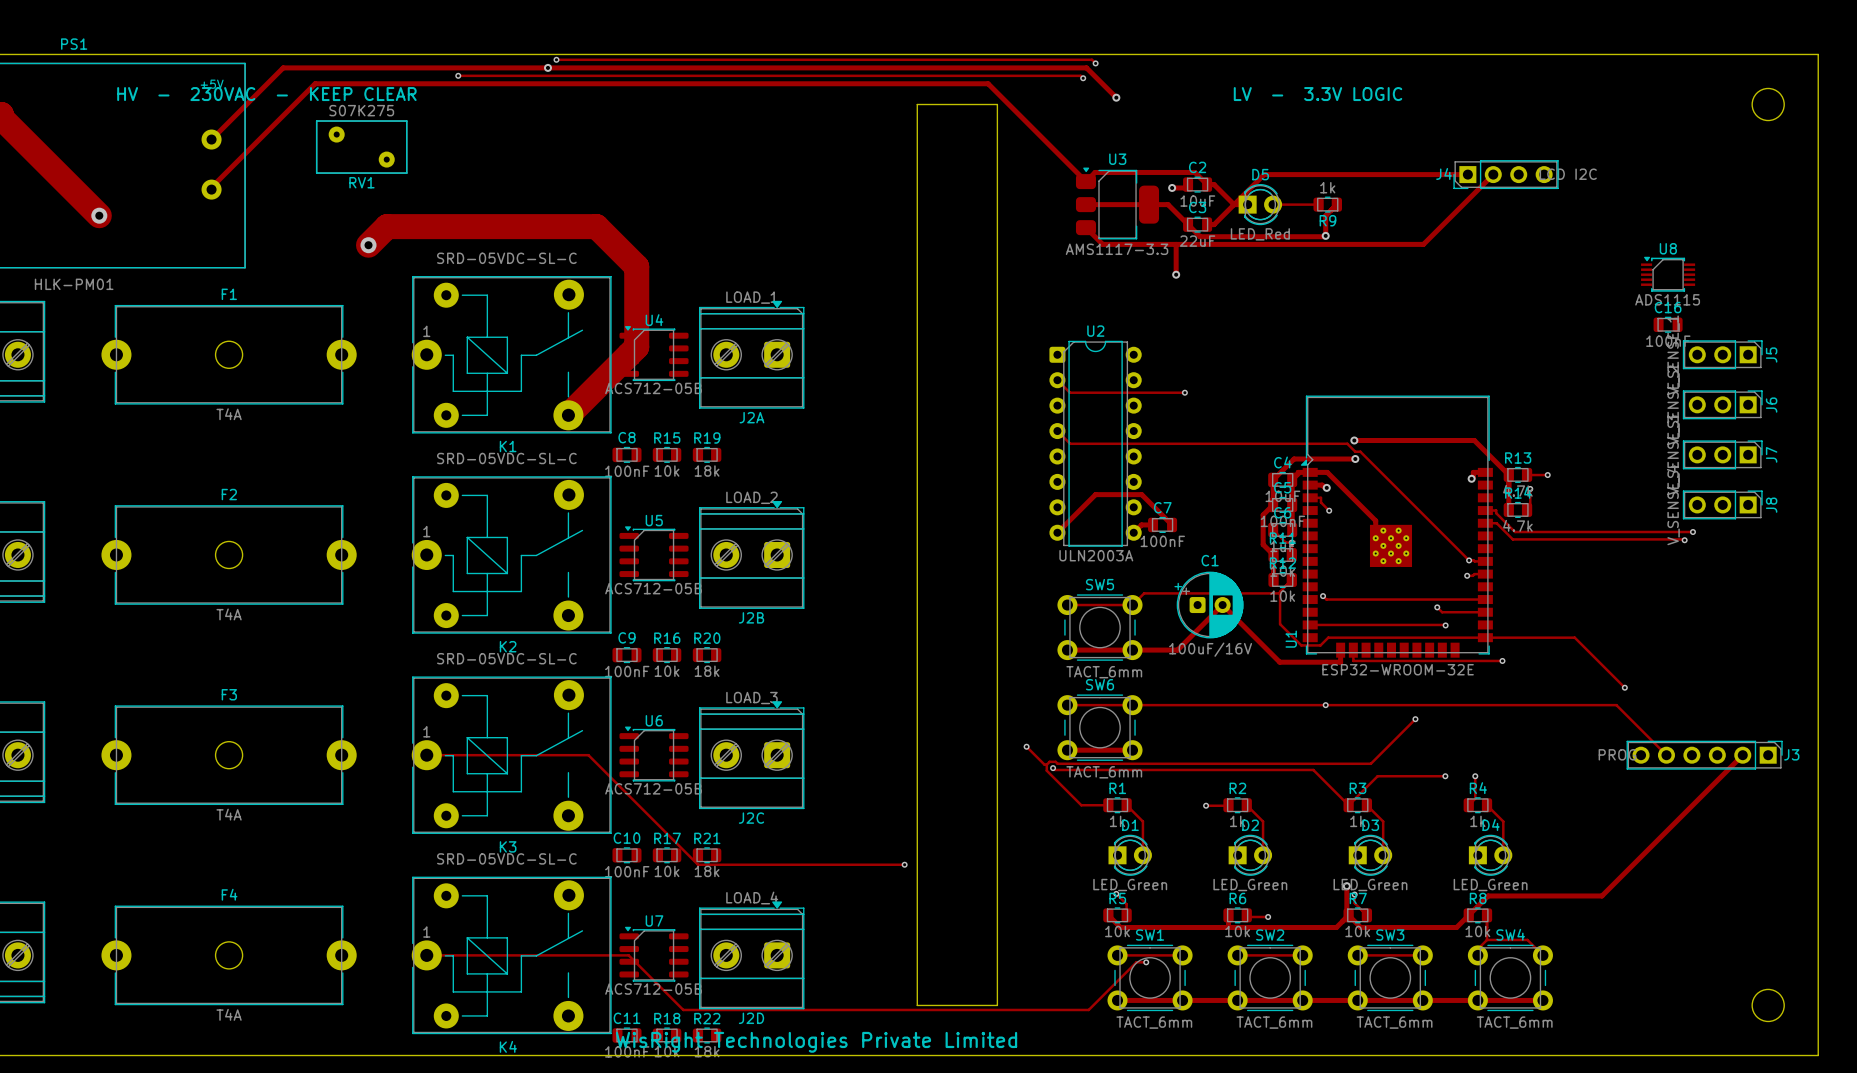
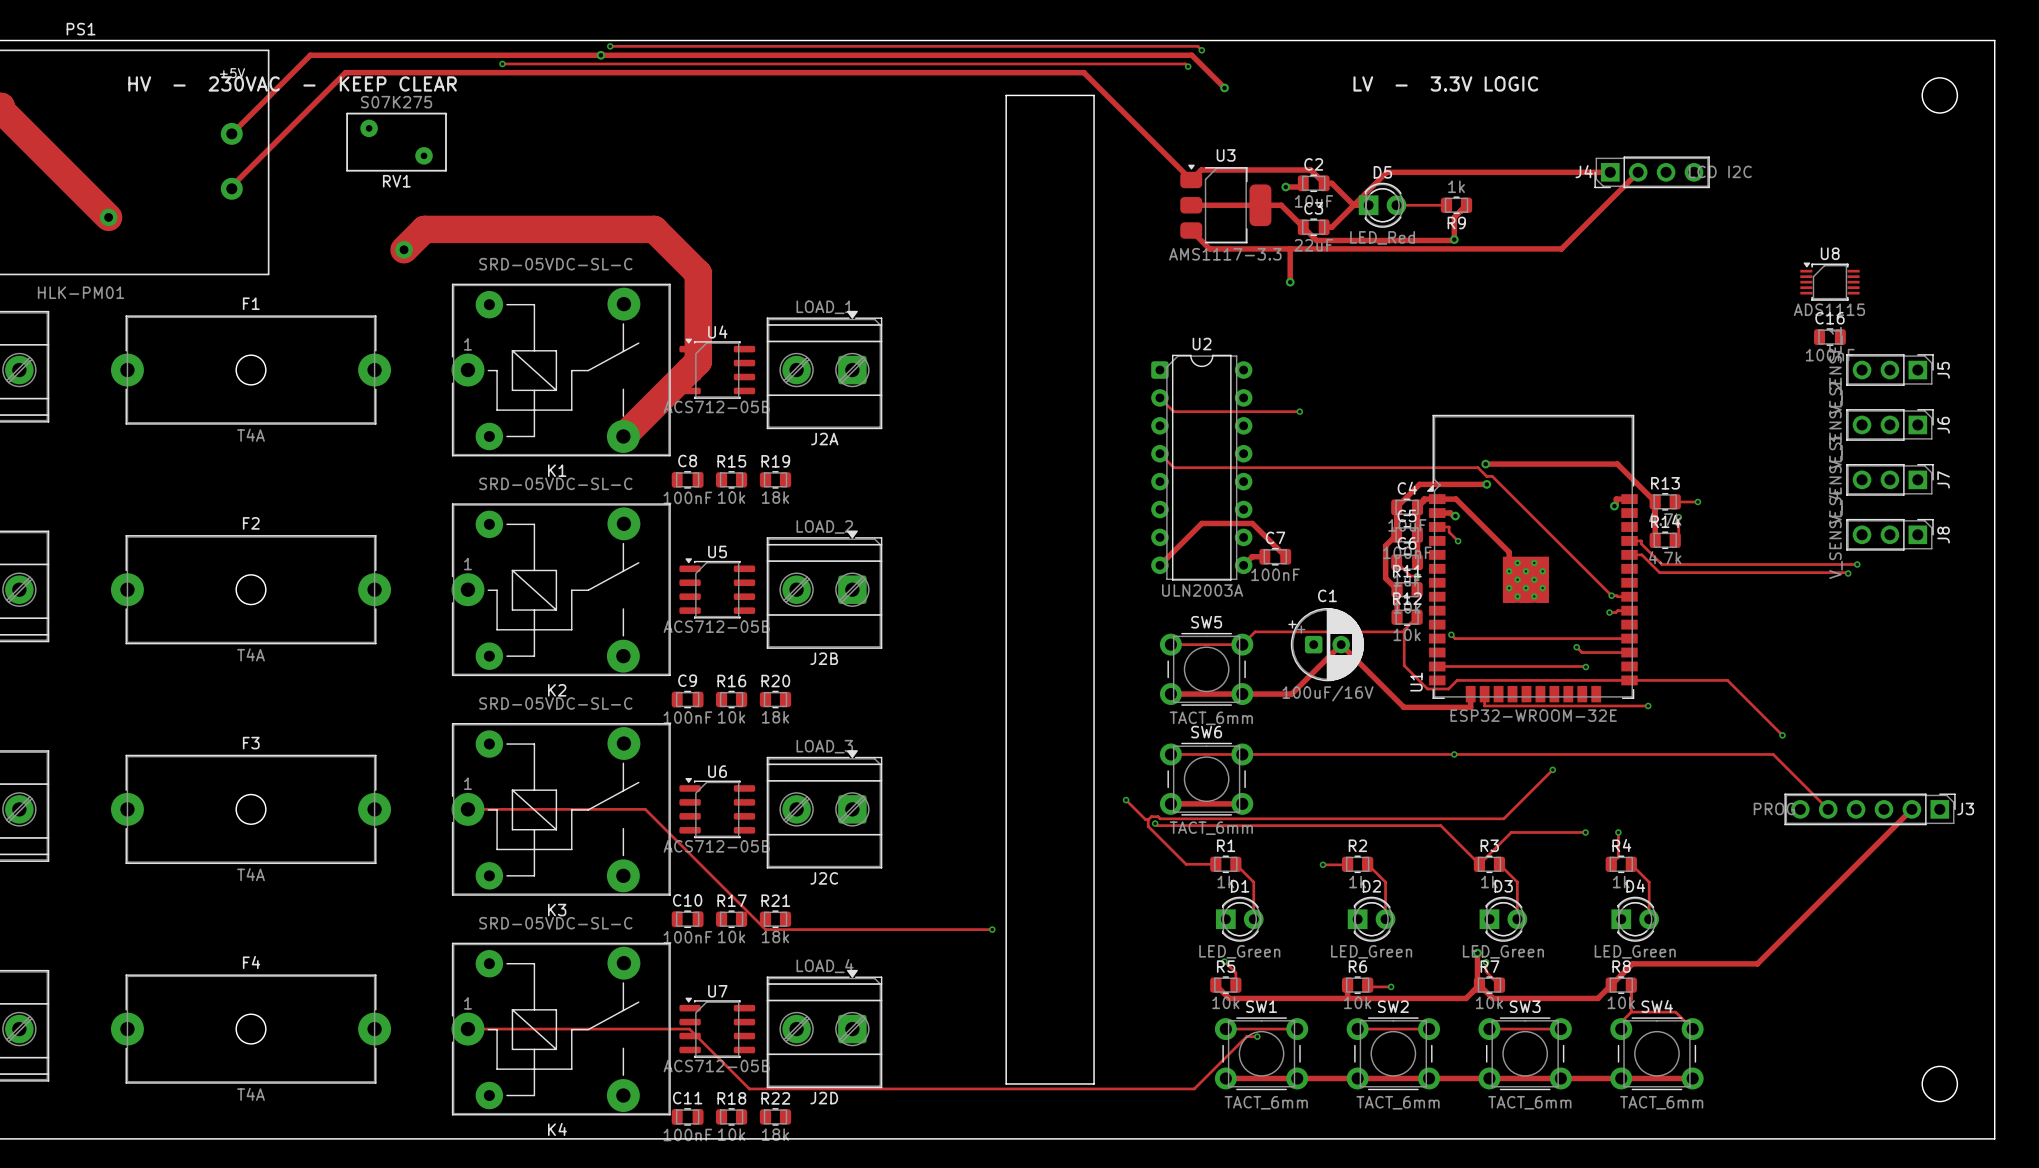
text: WisRight Technologies Private Limited (816, 1042) -> none

